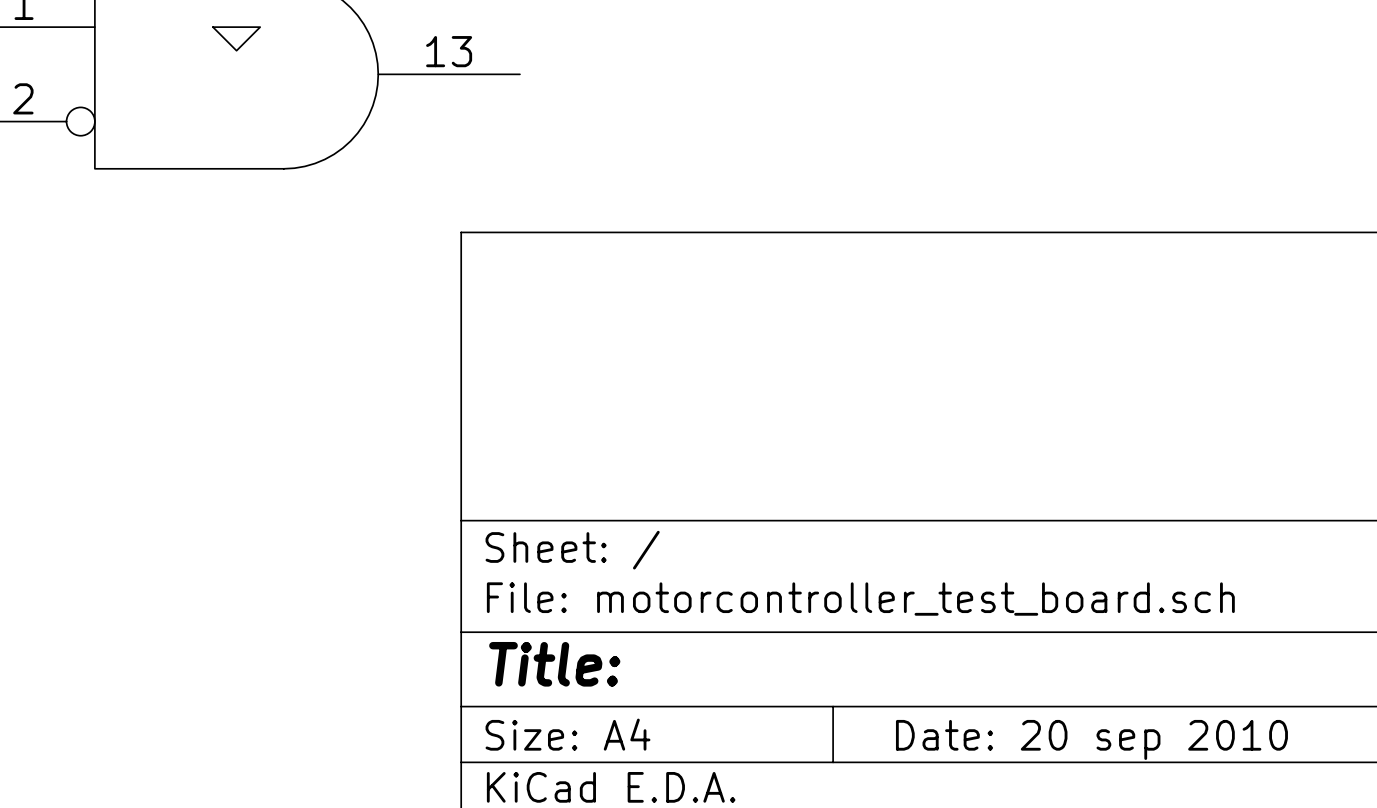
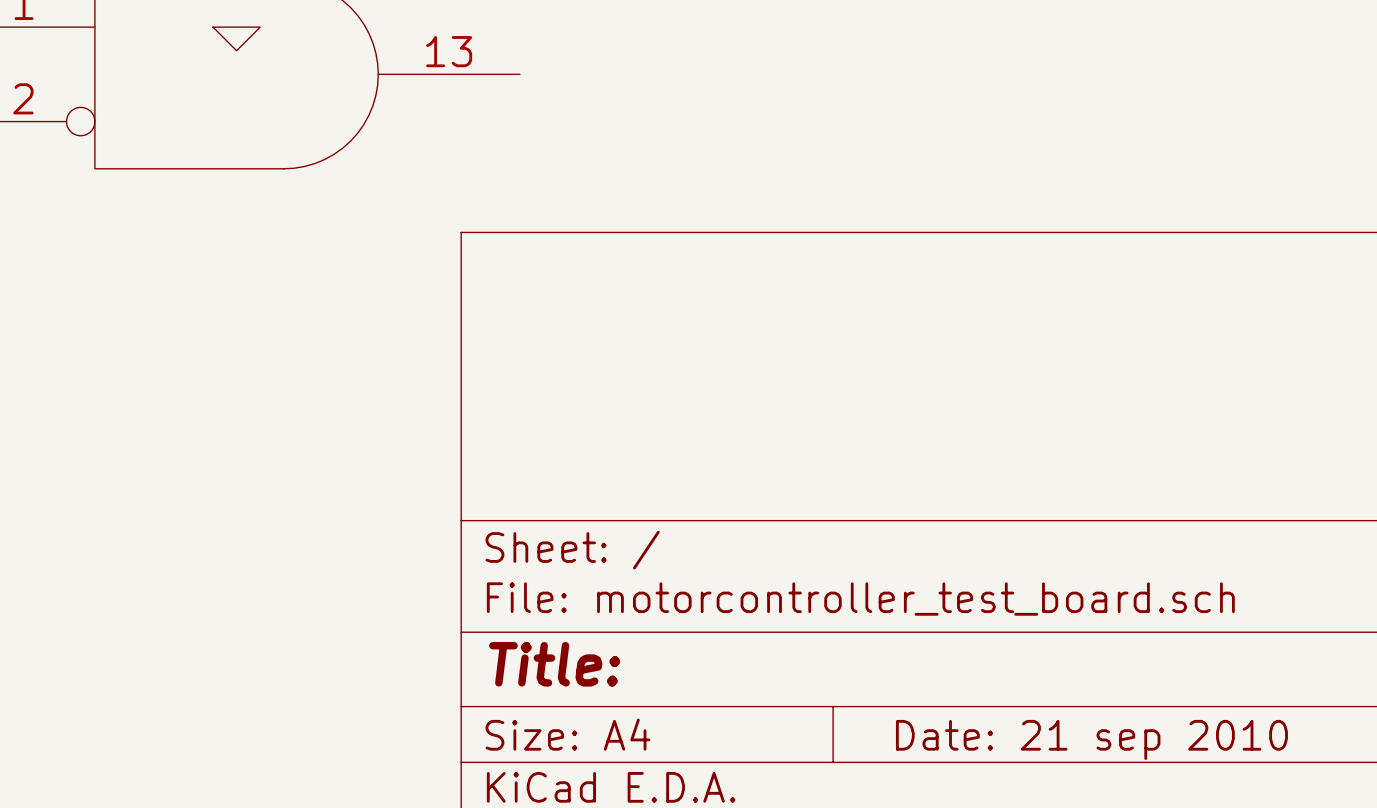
title block: Date: 20 sep 2010 (1091, 739) -> Date: 21 sep 2010 (1091, 739)

